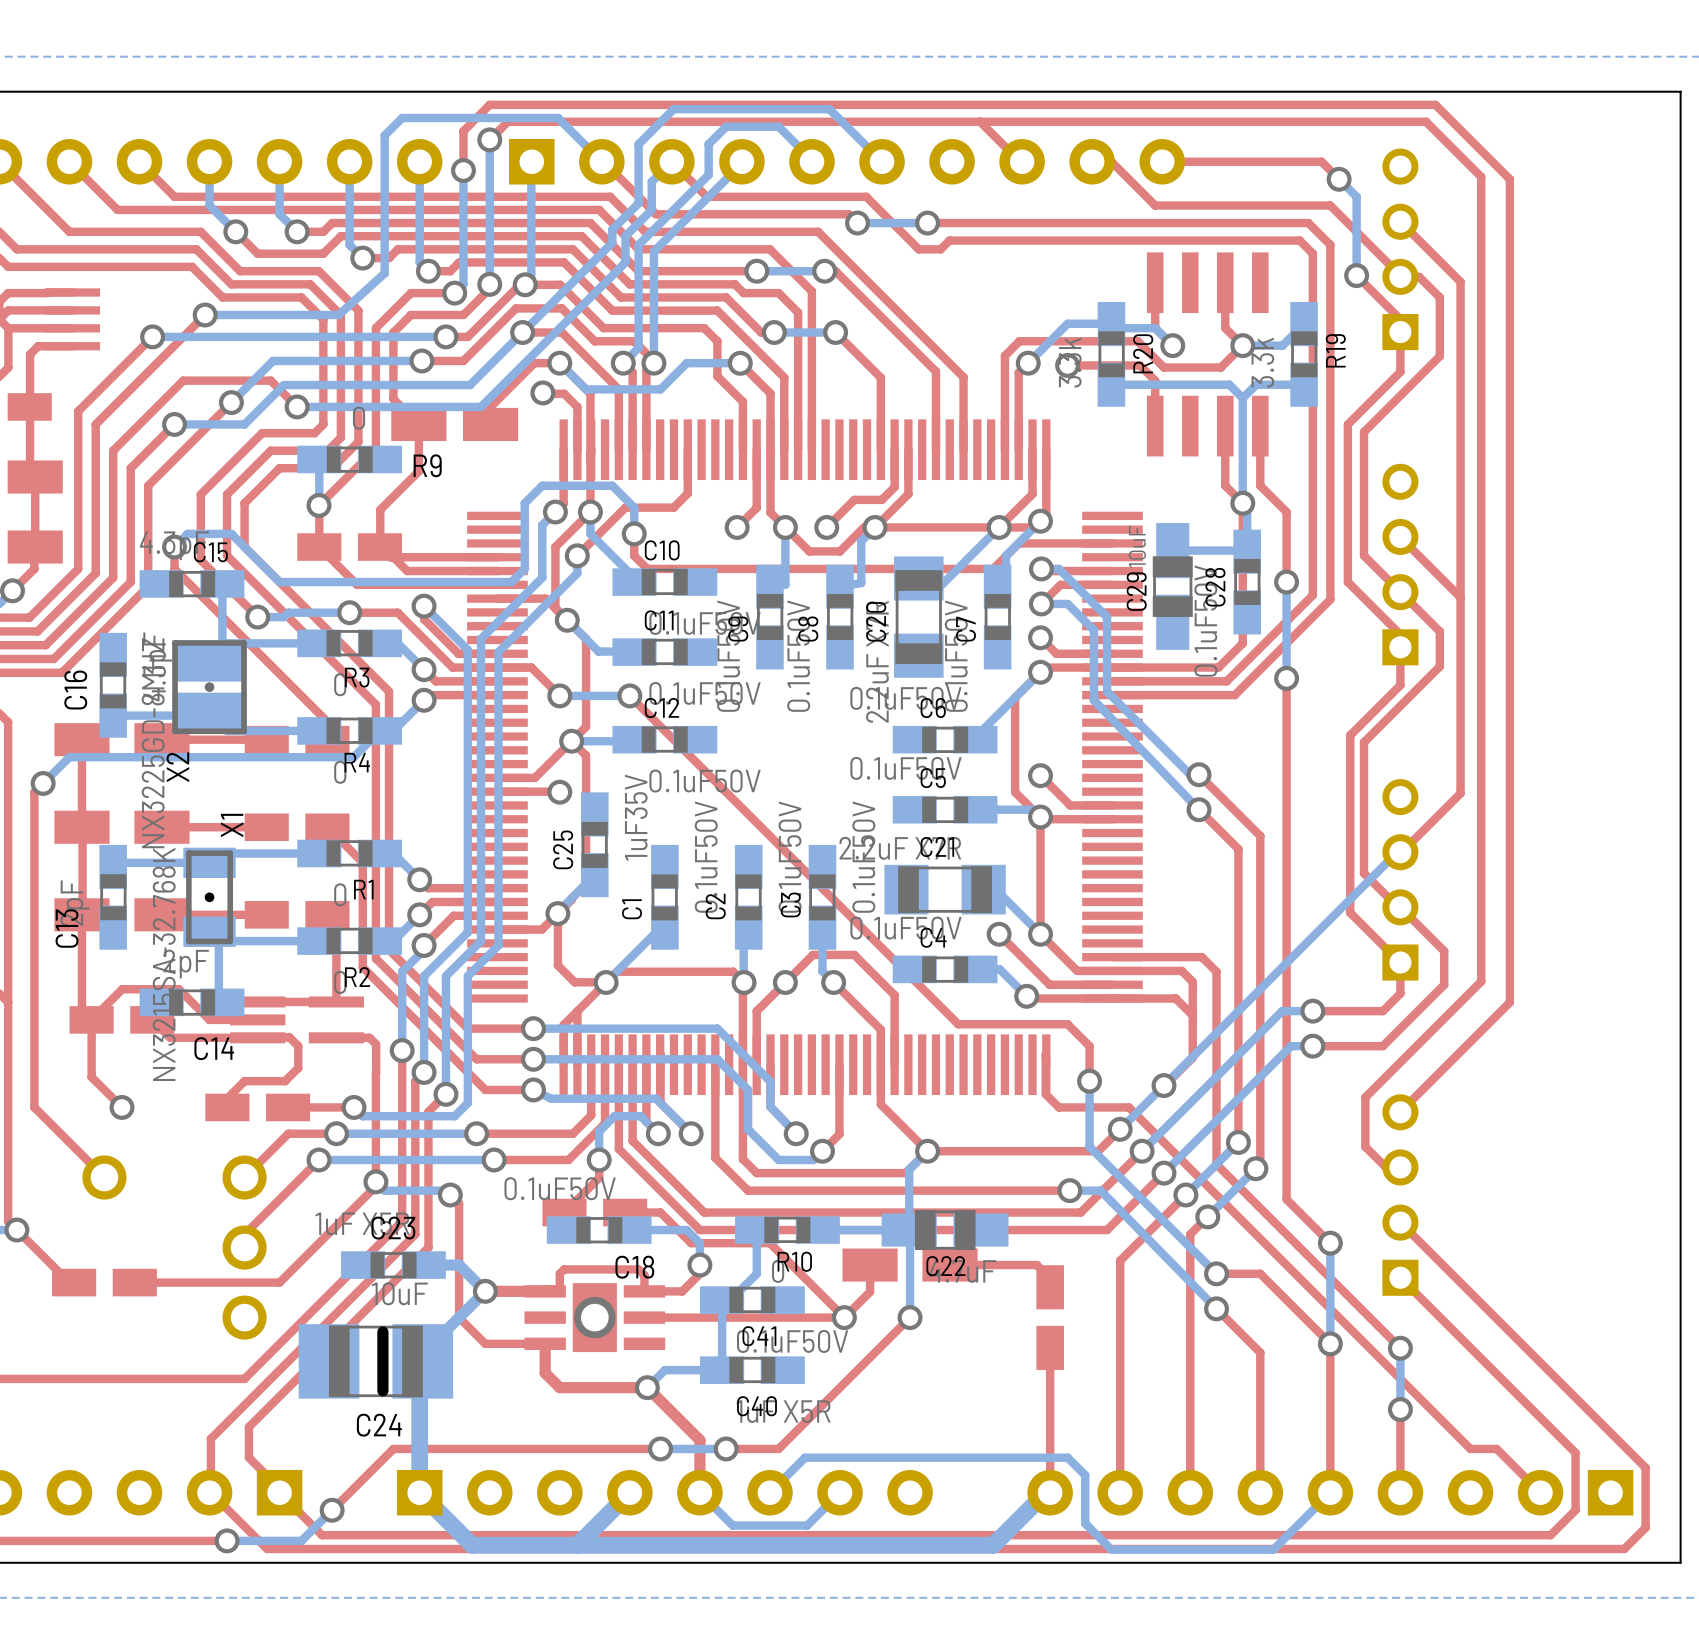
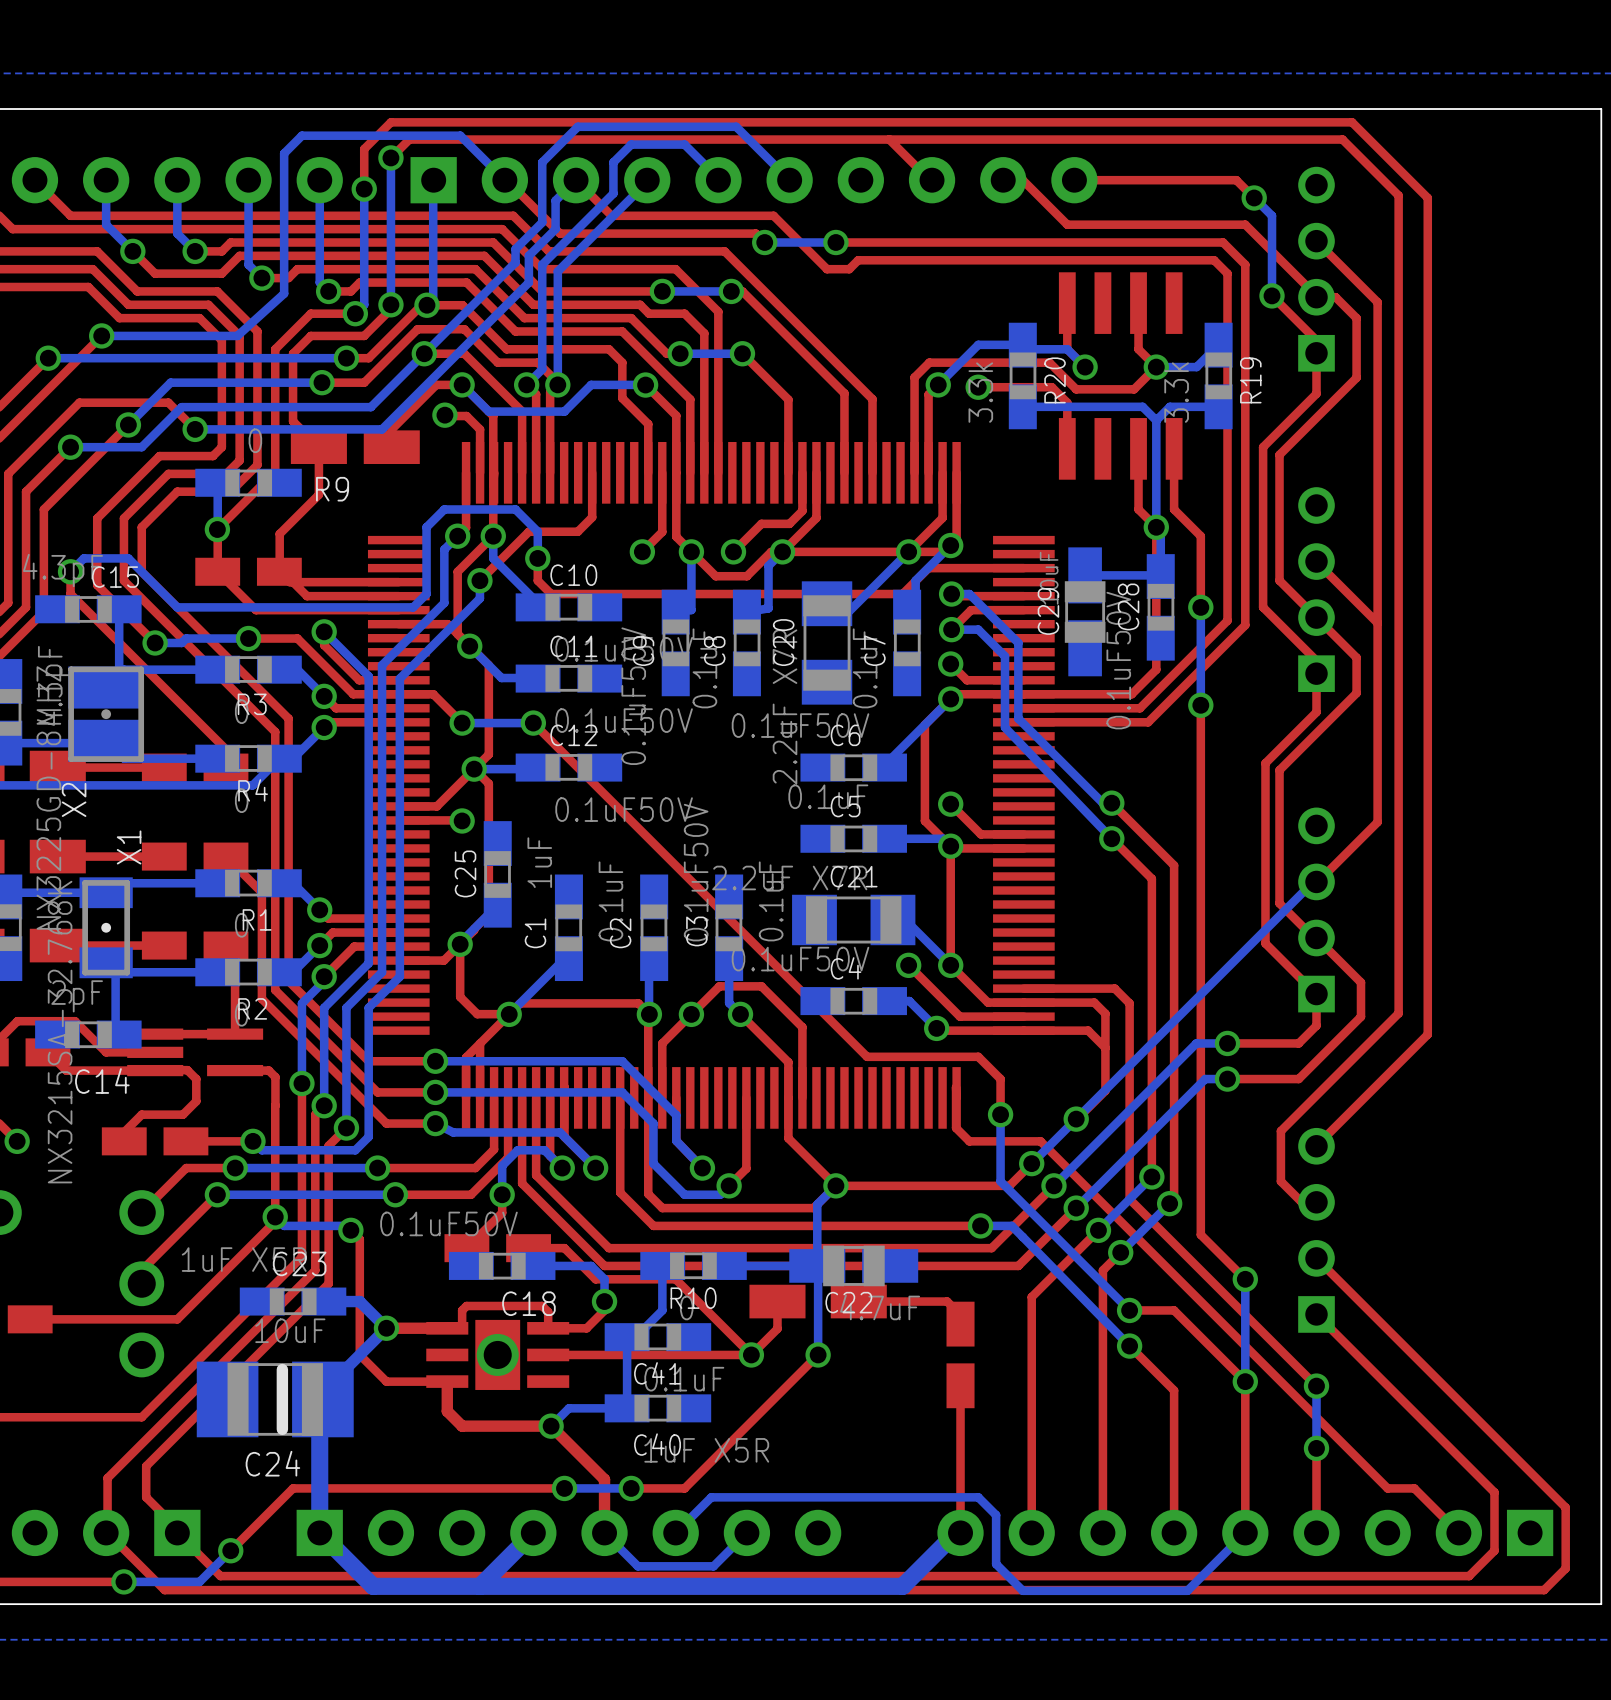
C8 value: 0.1uF50V (798, 656) -> 0.1uF (704, 668)
C7 value: 0.1uF50V (956, 656) -> 0.1uF (865, 668)
C5 value: 0.1uF50V (906, 768) -> 0.1uF (828, 796)
C25 value: 1uF35V (636, 817) -> 1uF (539, 862)
C1 value: 0.1uF50V (706, 857) -> 0.1uF (610, 901)
C3 value: 0.1uF50V (863, 857) -> 0.1uF (771, 901)
C41 value: 0.1uF50V (792, 1341) -> 0.1uF (684, 1379)

